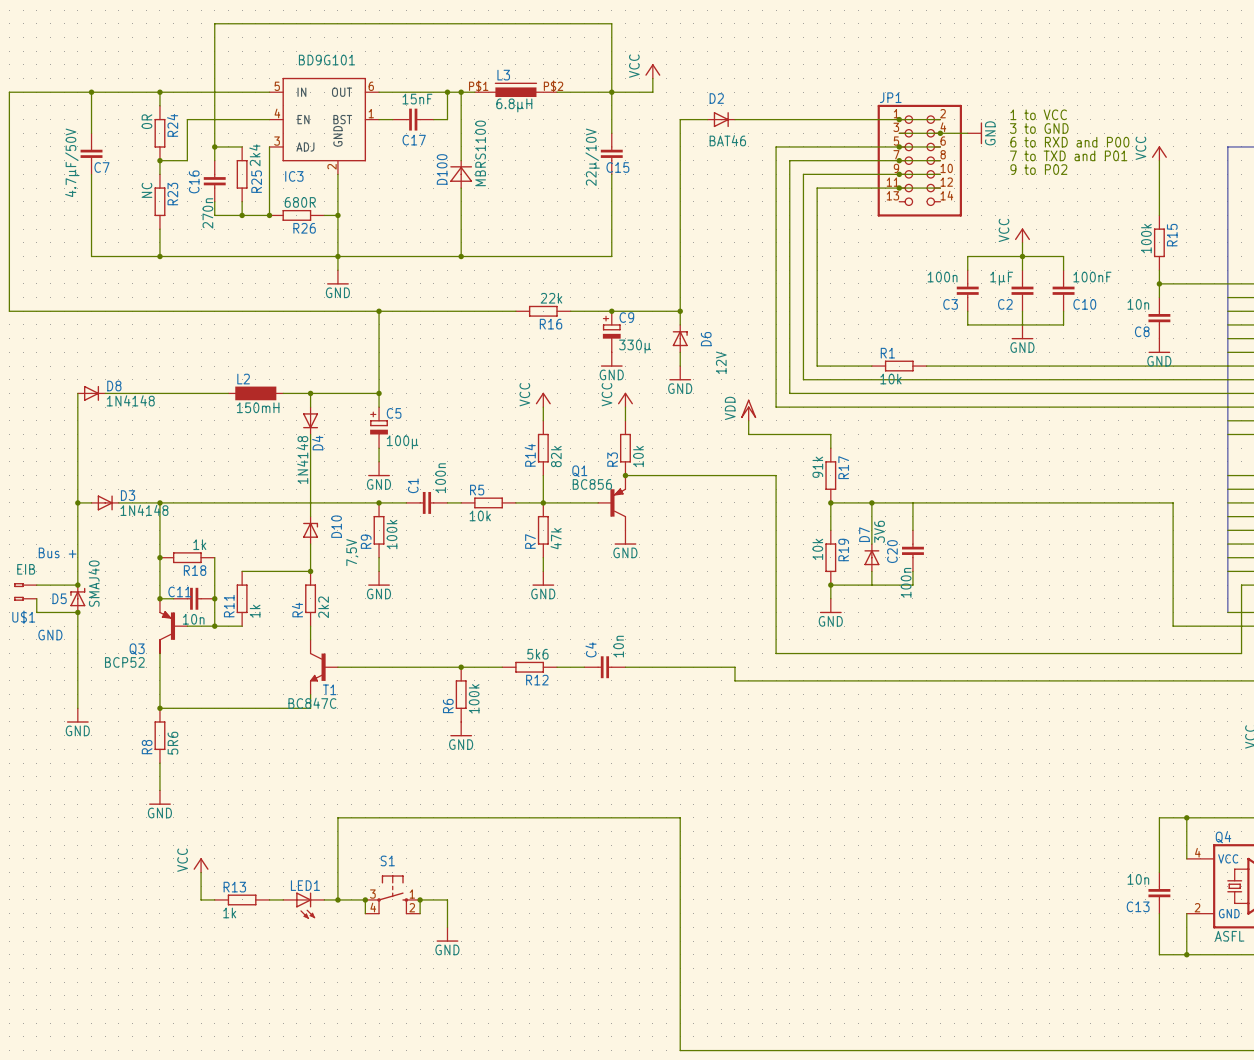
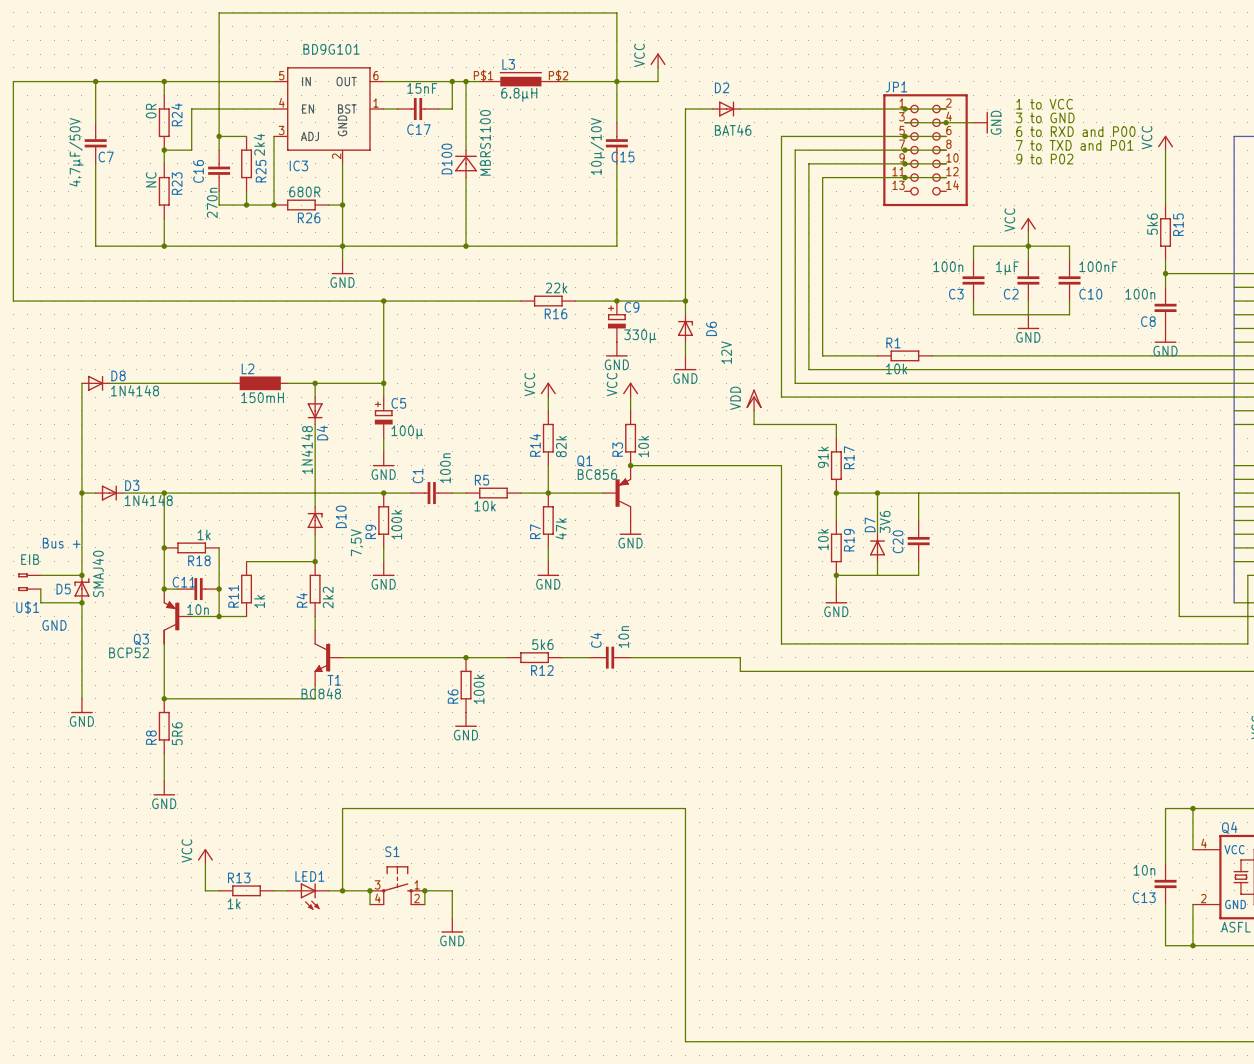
C15 value: 22µ/10V (592, 157) -> 10µ/10V (597, 146)
R15 value: 100k (1146, 238) -> 5k6 (1152, 224)
C8 value: 10n (1138, 304) -> 100n (1140, 294)
C20 value: 100n (906, 582) -> none
T1 value: BC847C (312, 703) -> BC848 (321, 693)

